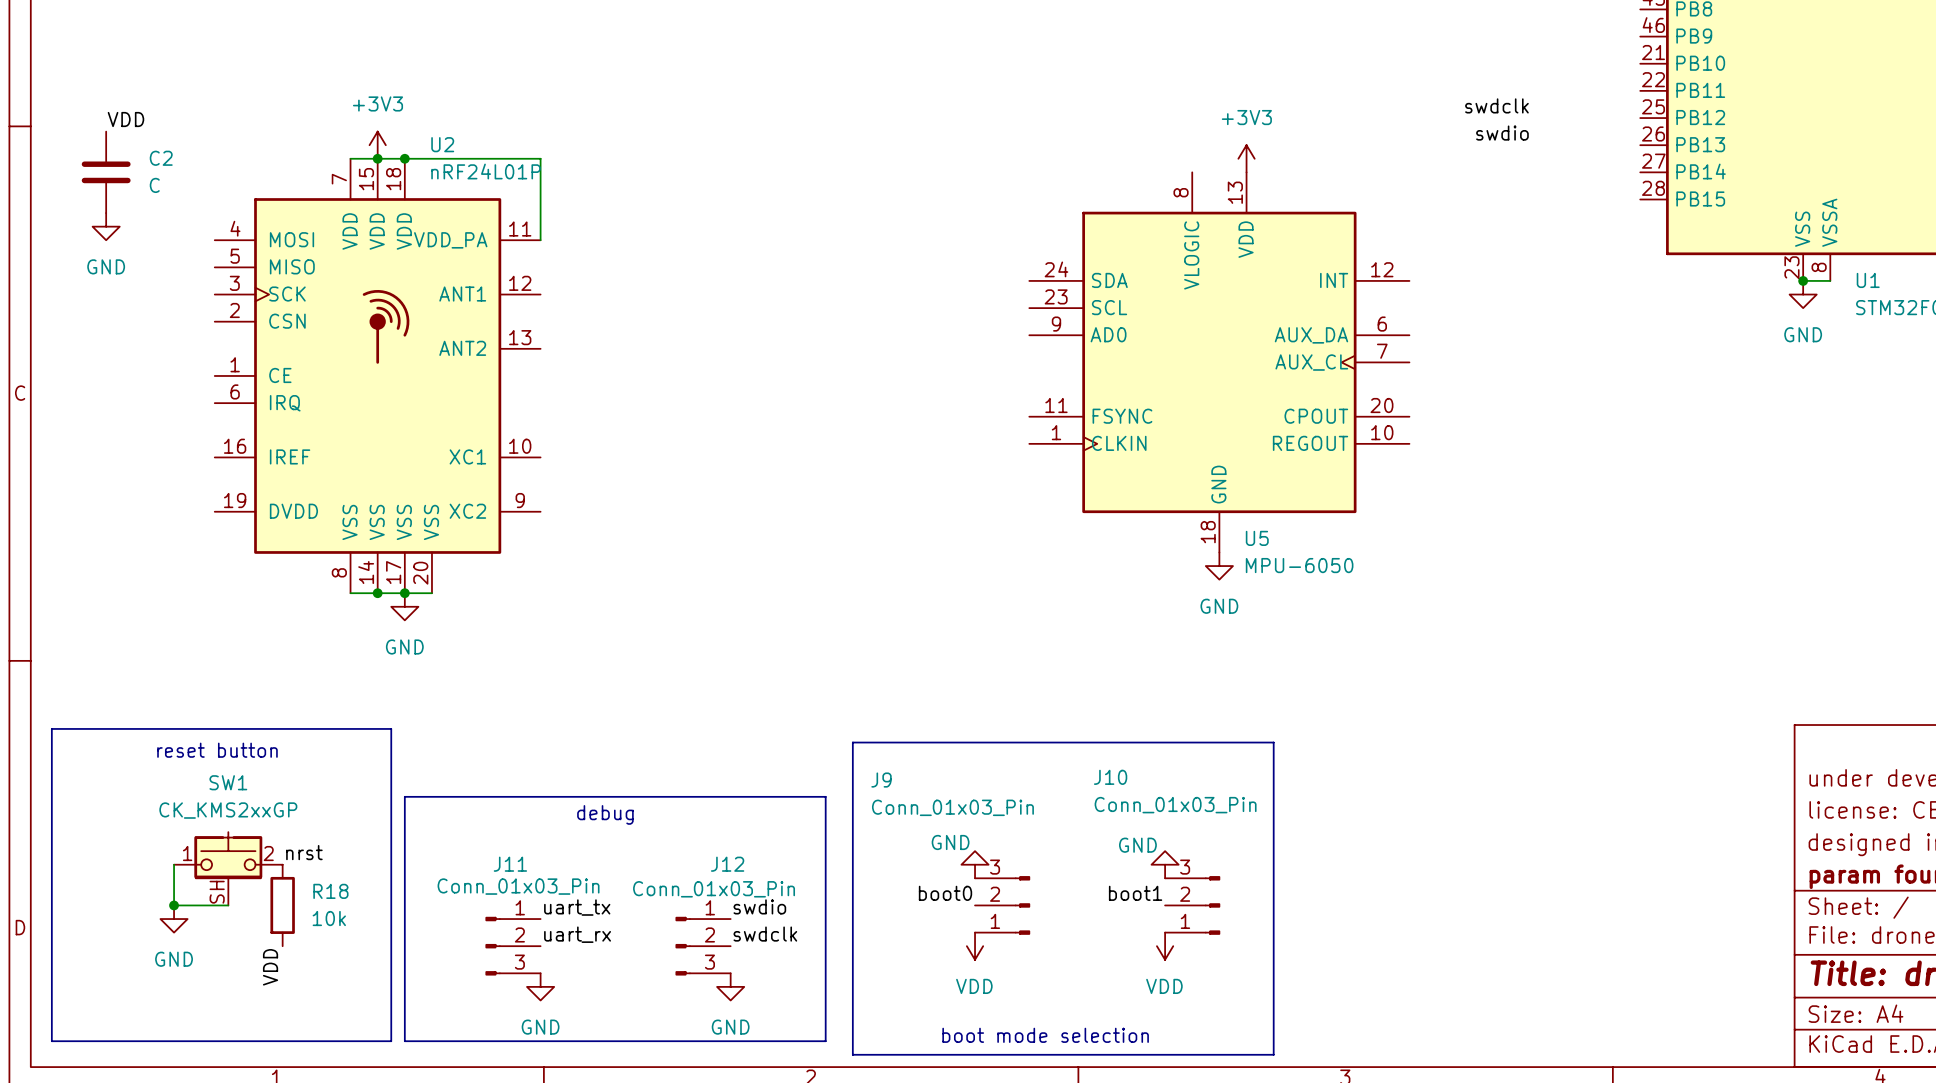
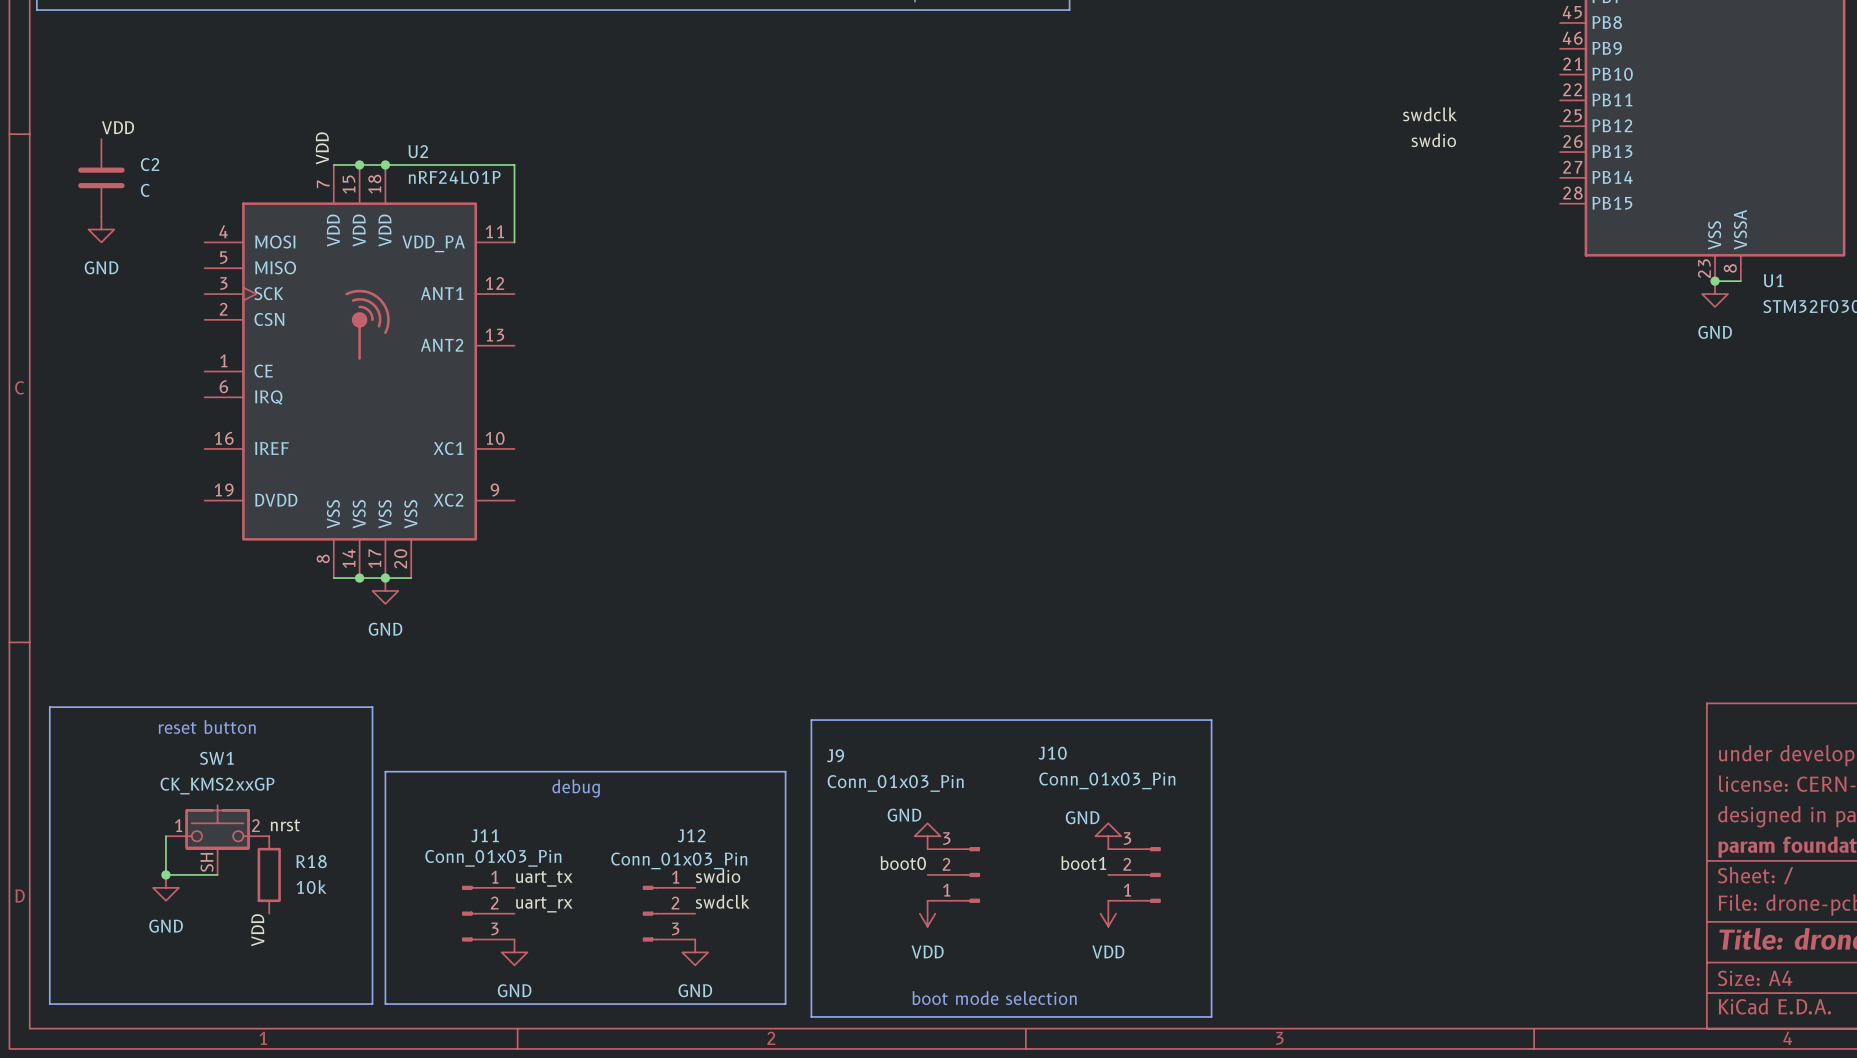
label: none -> VDD (322, 148)
power symbol: +3V3 (377, 145) -> none
power symbol: +3V3 (1246, 158) -> none
U5: MPU-6050 (1219, 362) -> none
power symbol: GND (1219, 566) -> none

